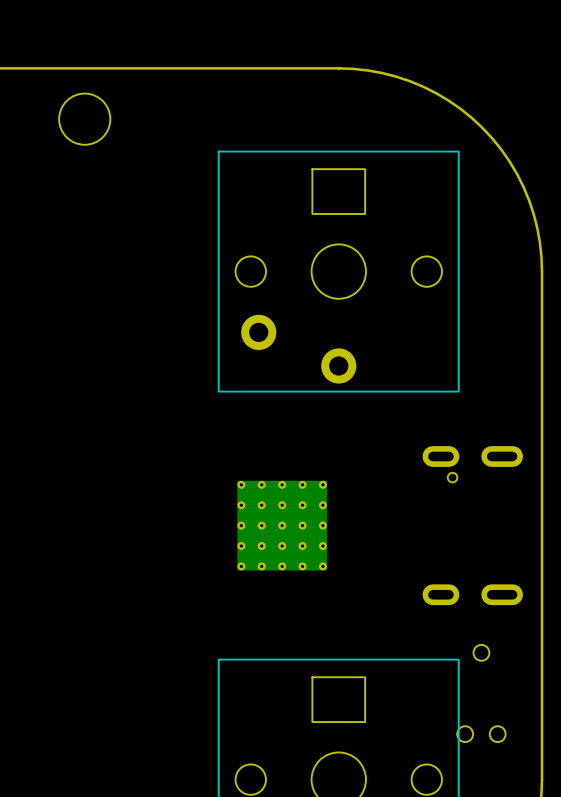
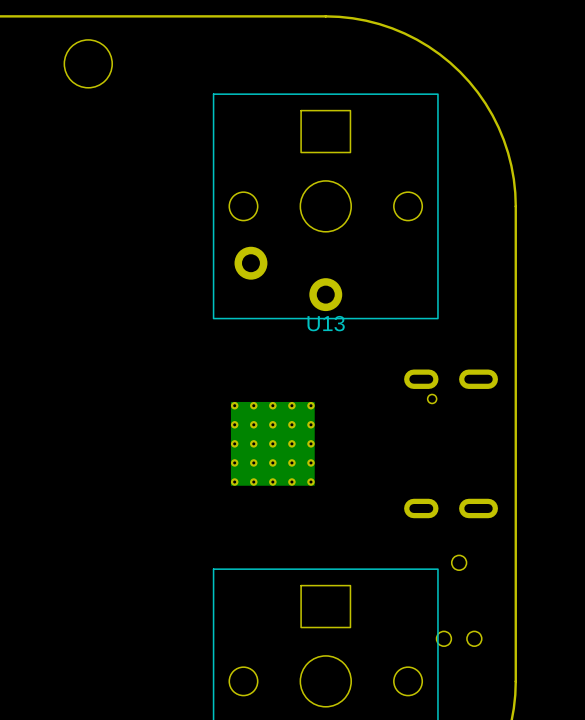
U13 name: none -> U13 (326, 323)

